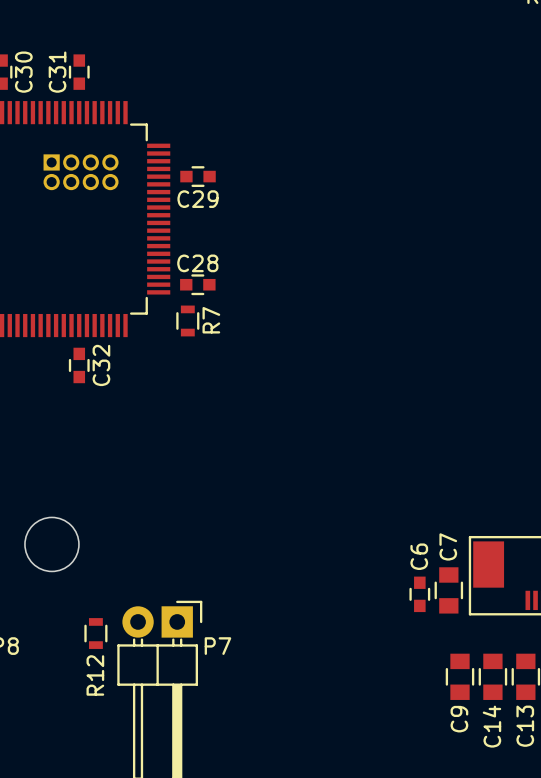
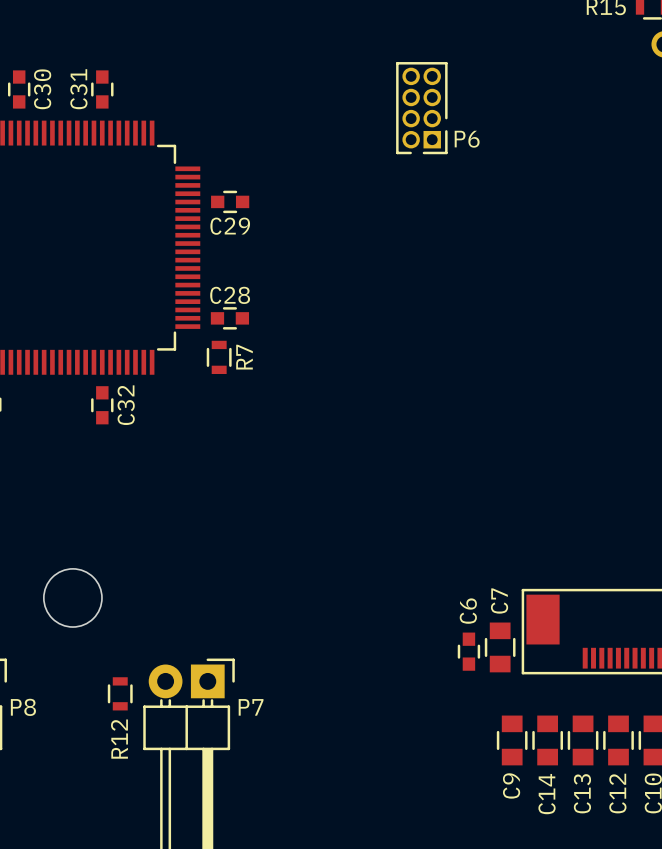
P6 side: bottom (81, 172) -> top (421, 108)

